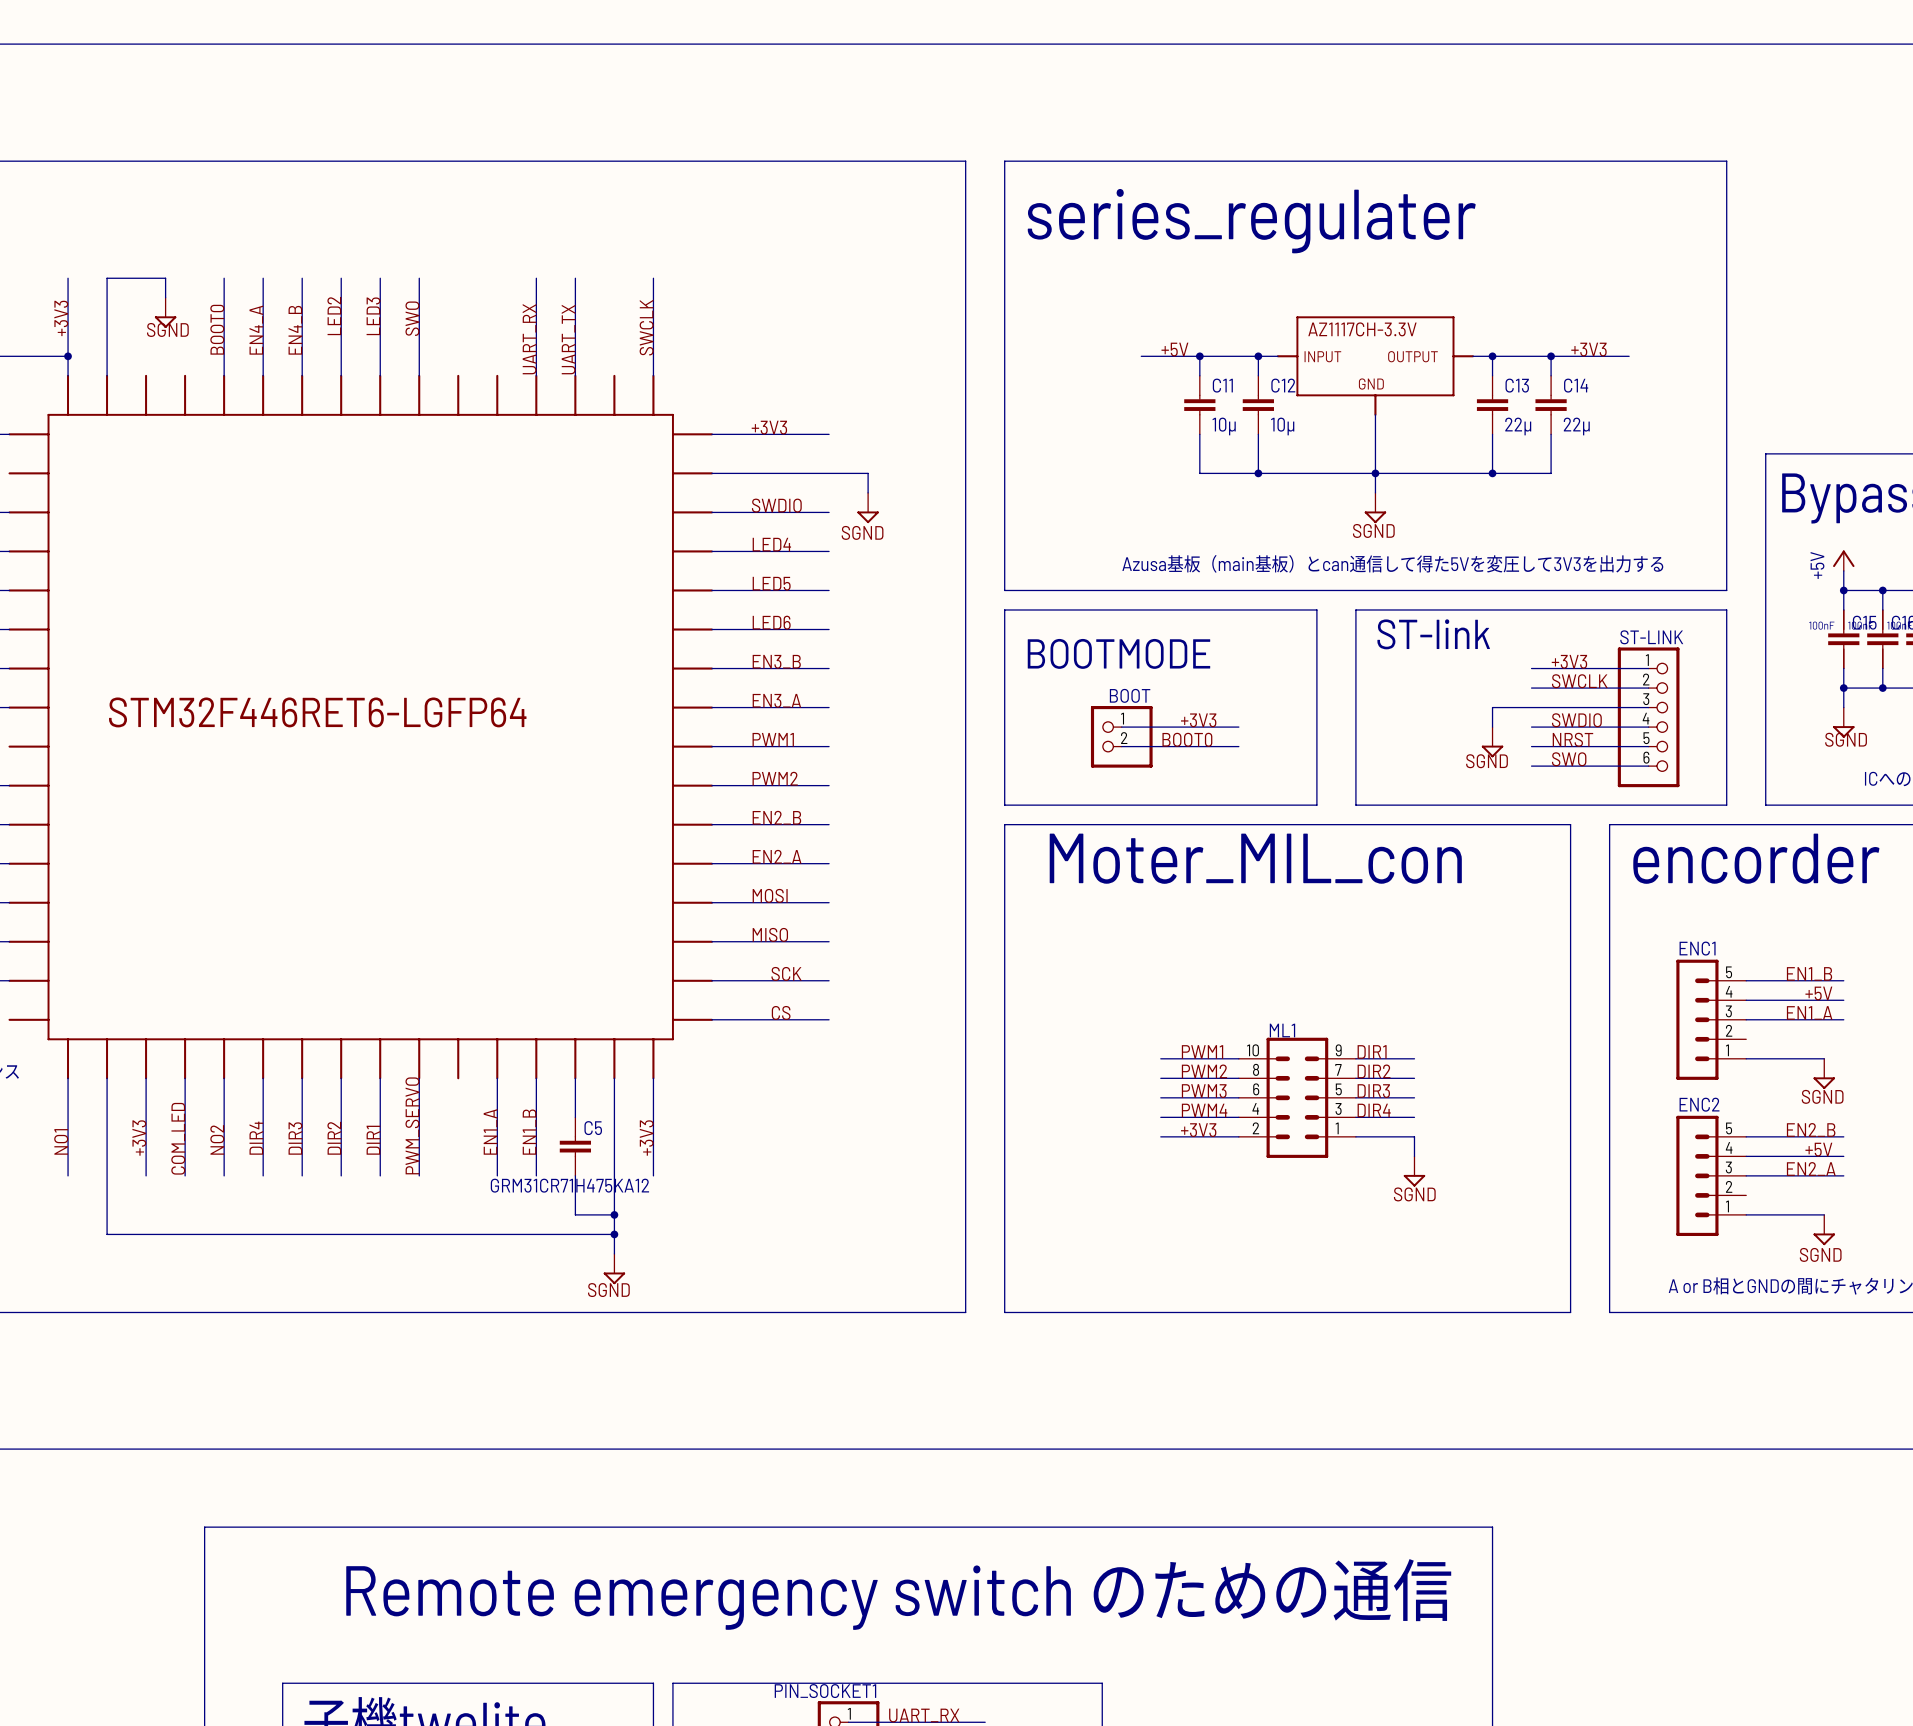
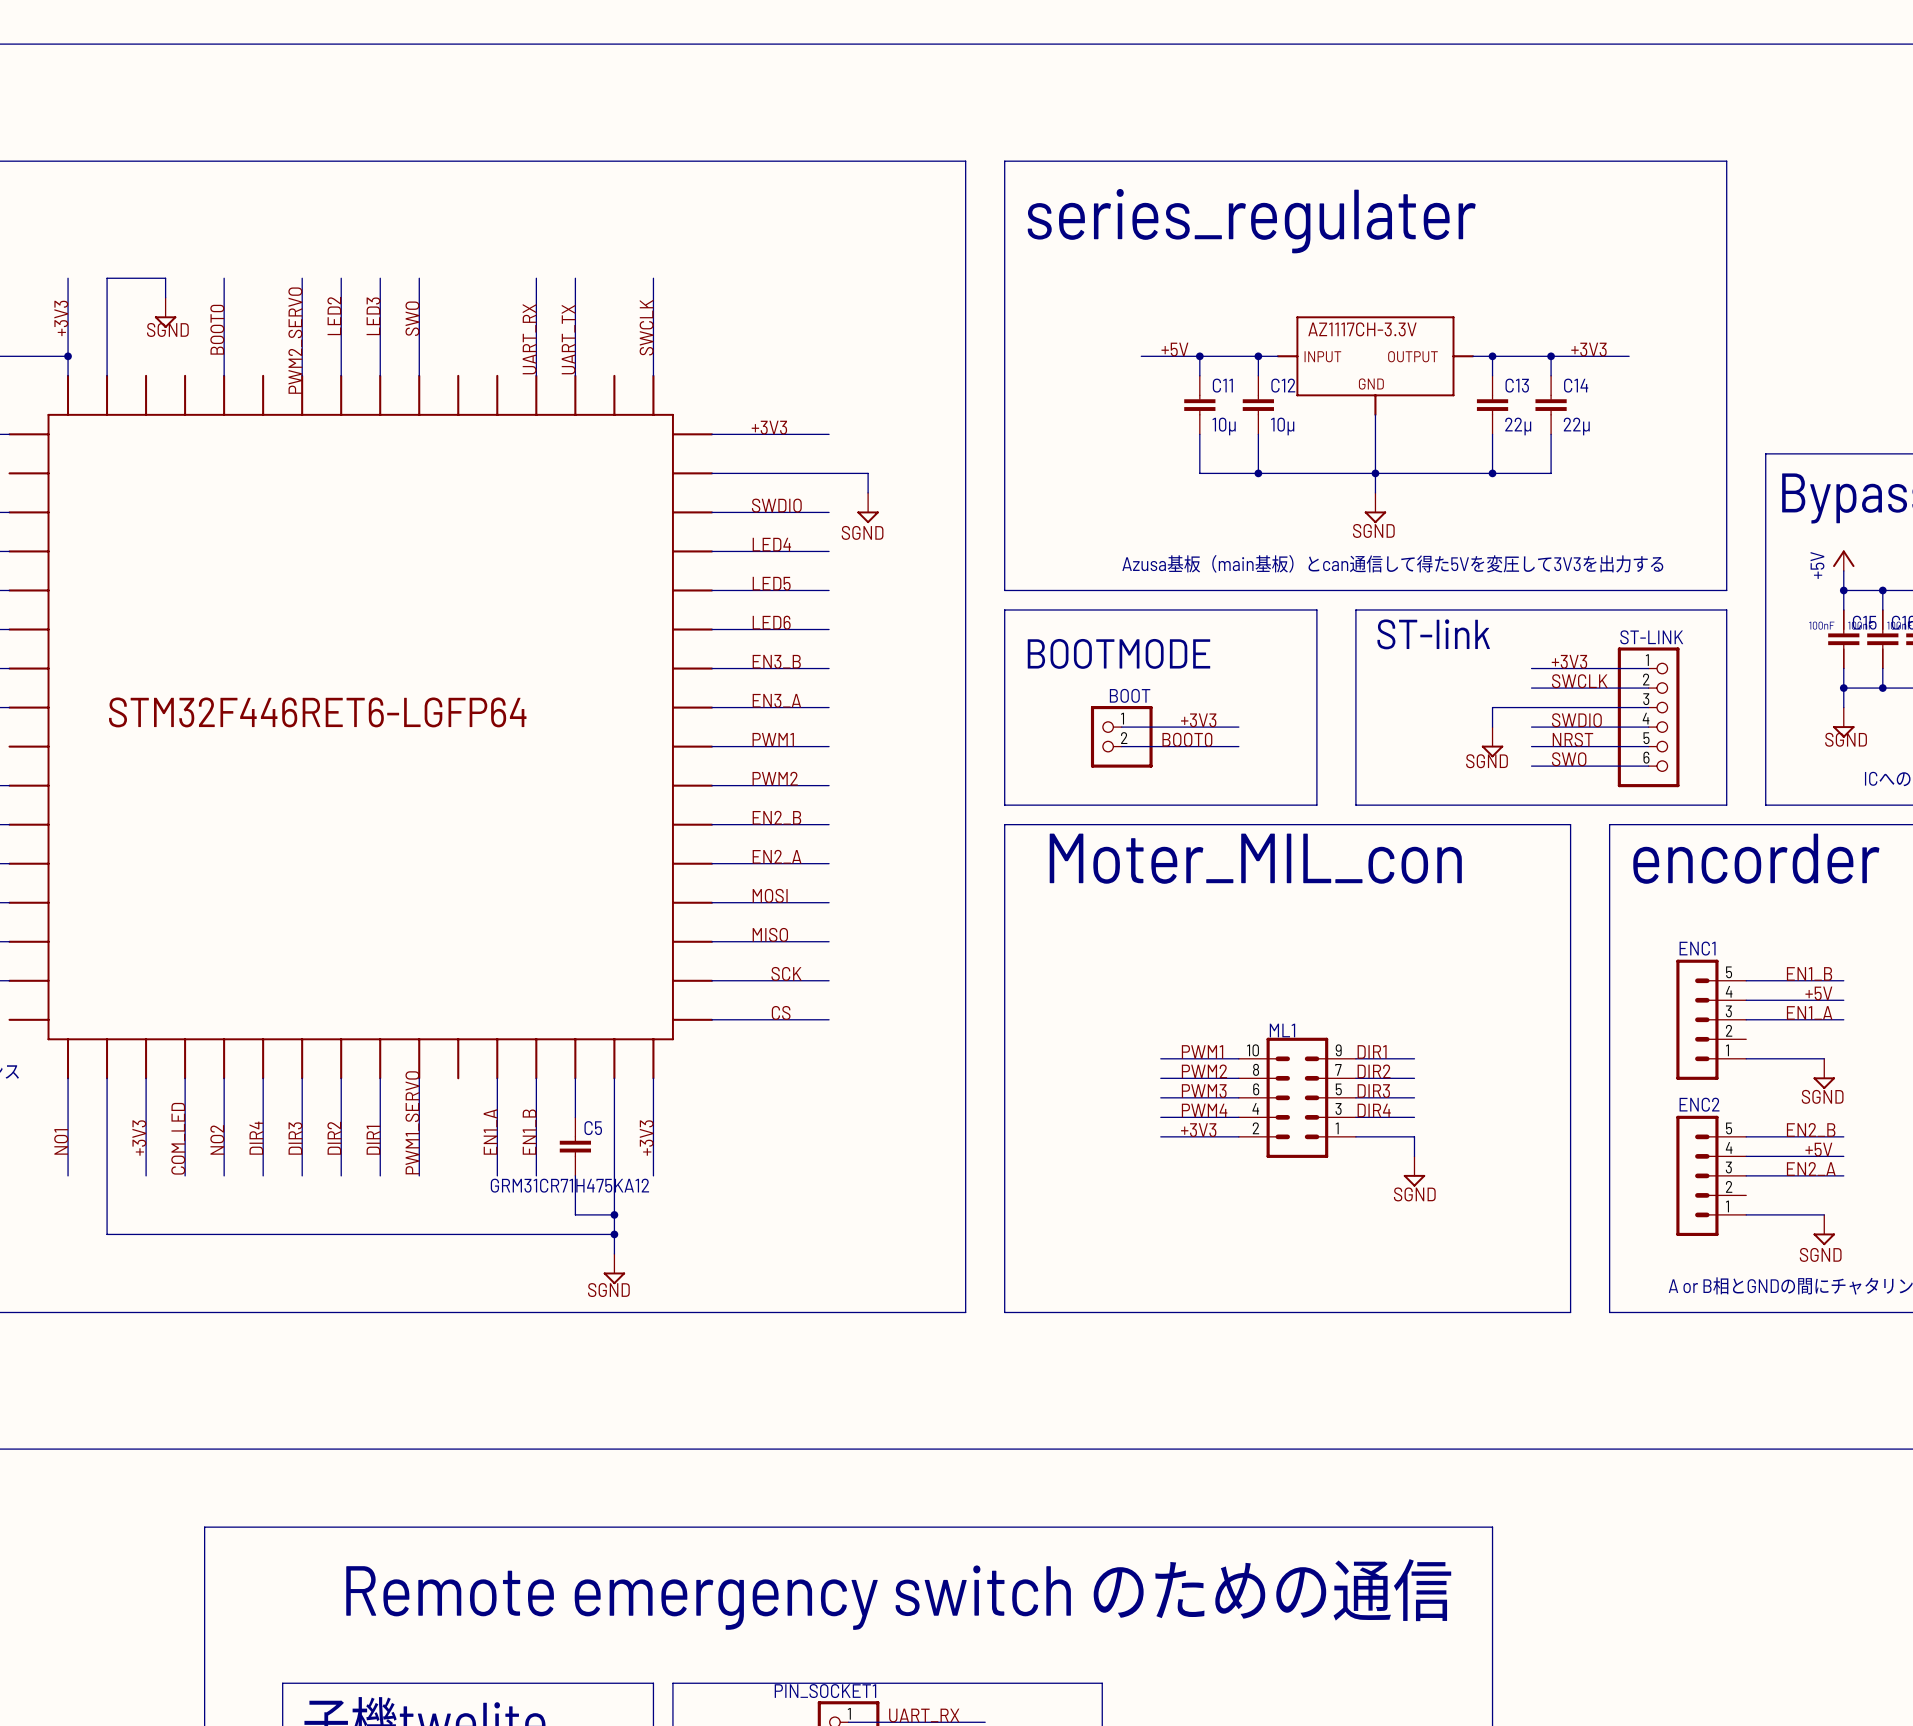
wire: (263, 278) (263, 375) -> none
label: EN4_A (256, 330) -> none
label: EN4_B (295, 330) -> none
label: none -> PWM2_SERVO (295, 340)
label: PWM_SERVO (412, 1125) -> PWM1_SERVO (412, 1122)

